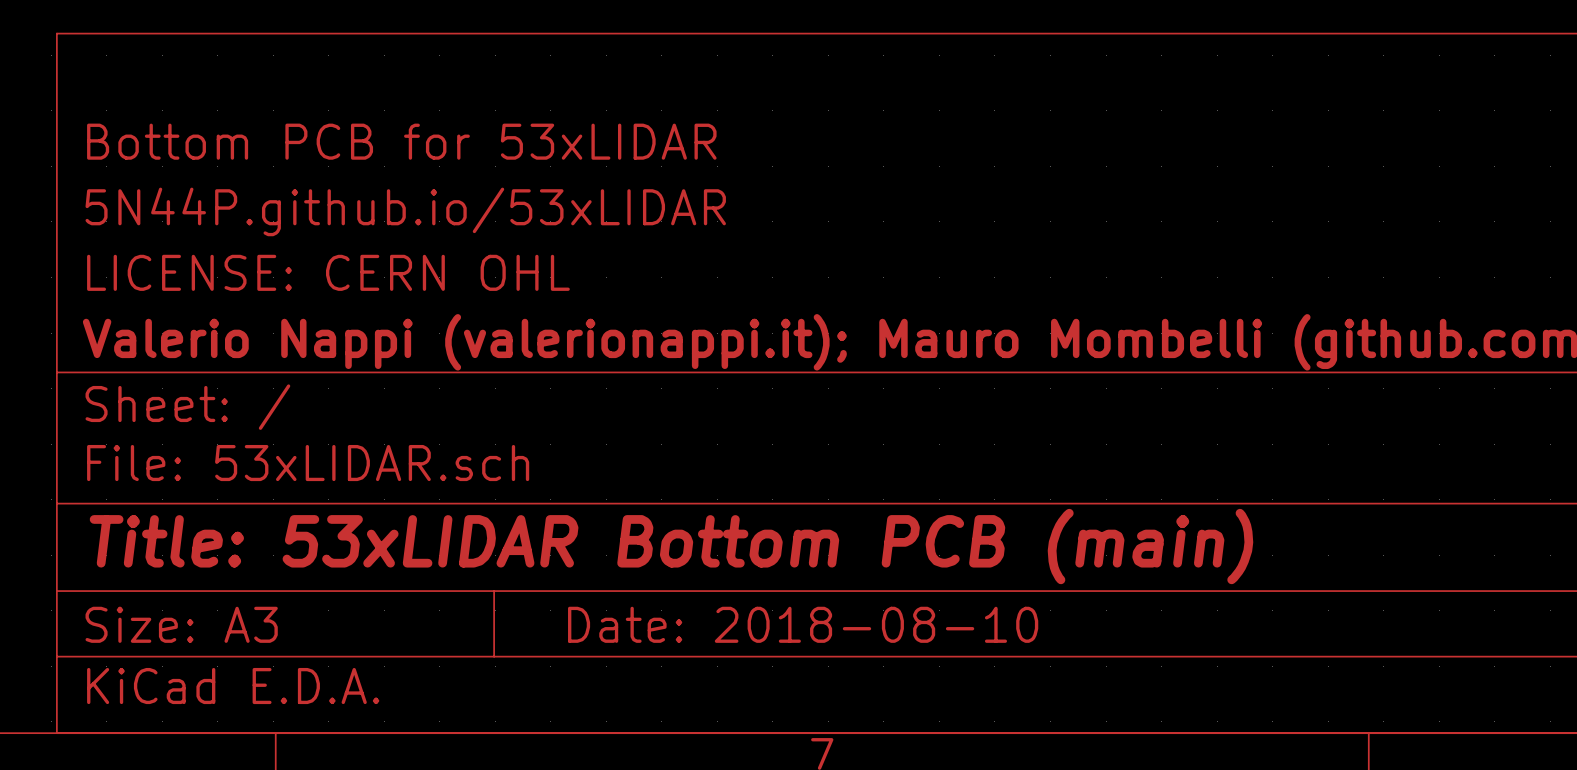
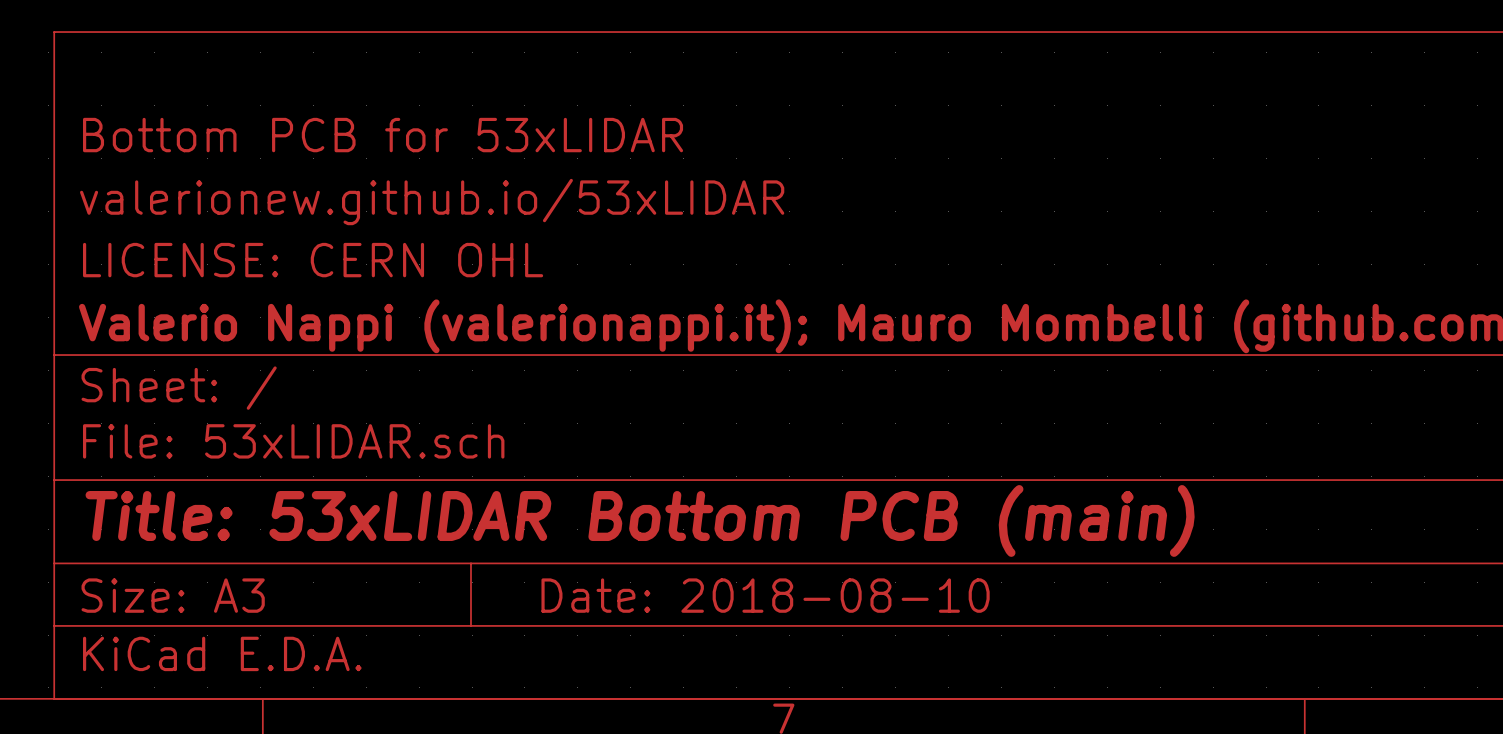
title block: 5N44P.github.io/53xLIDAR (405, 211) -> valerionew.github.io/53xLIDAR (432, 202)

